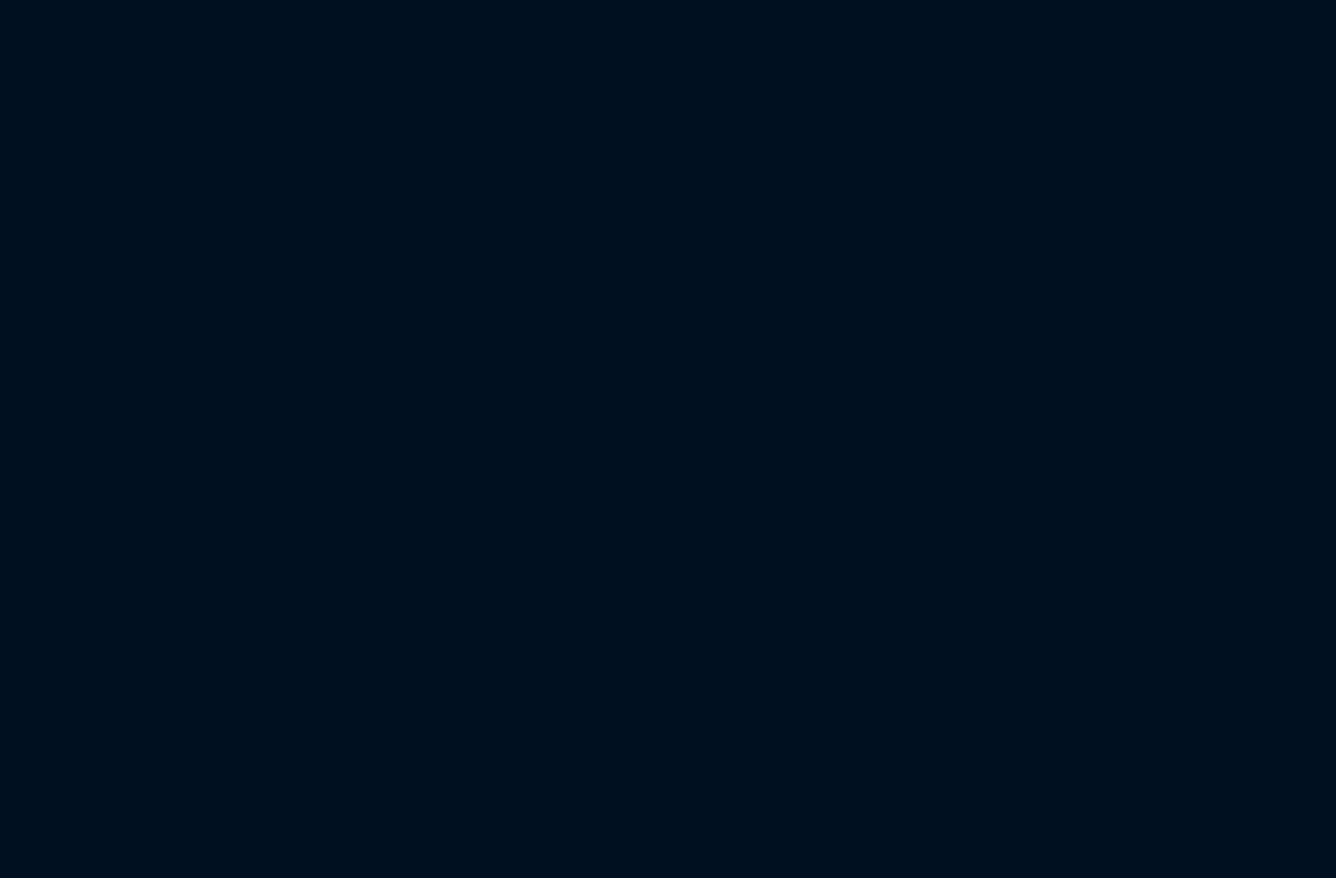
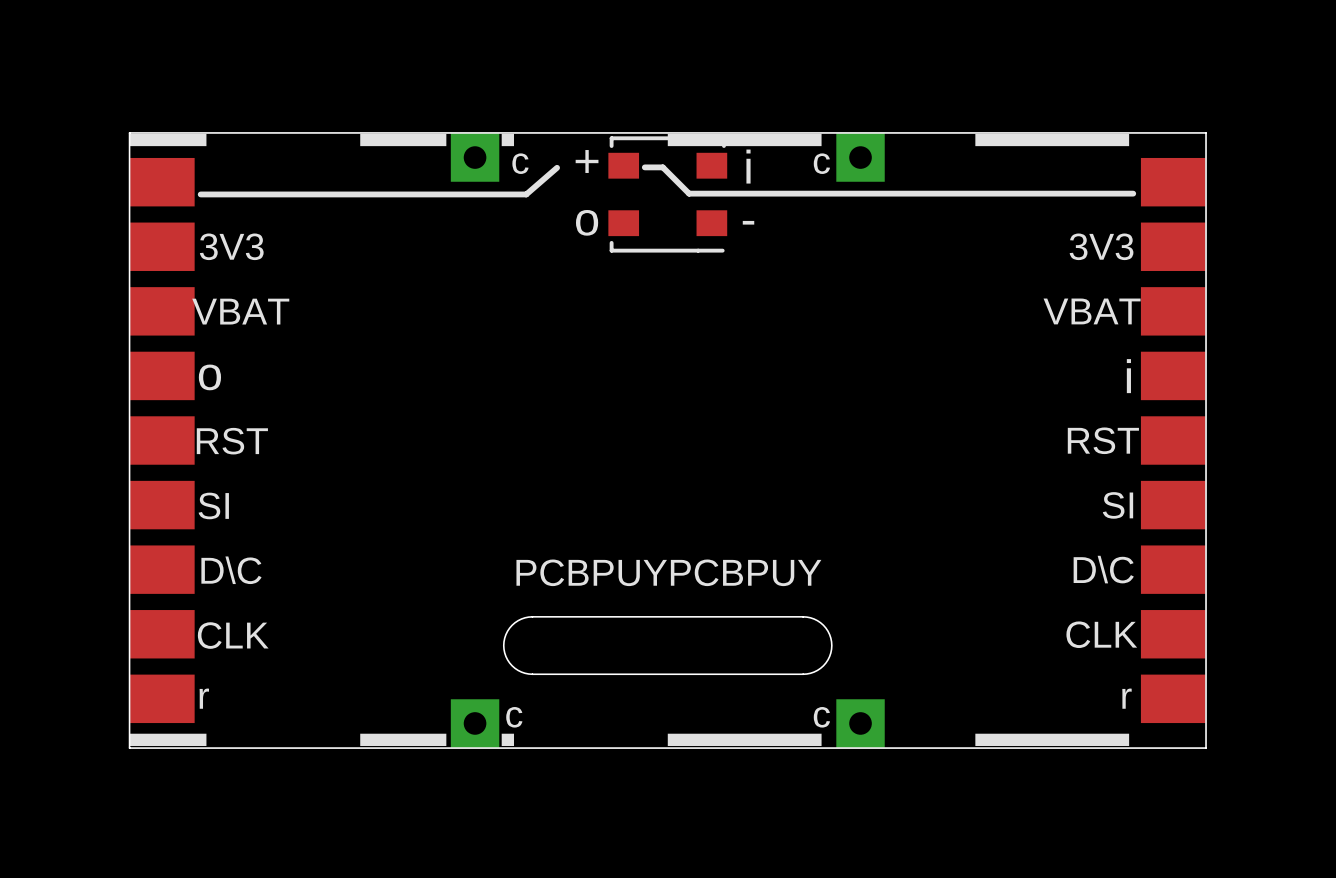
board edge: none -> (129, 132) (1206, 132) (1206, 748) (129, 748) (129, 132)
drawing: none -> [129, 133, 207, 147]
drawing: none -> [360, 133, 447, 147]
drawing: none -> [501, 133, 515, 147]
drawing: none -> [667, 133, 822, 147]
drawing: none -> [975, 133, 1130, 147]
part: none -> (475, 157)
part: none -> (860, 157)
text: none -> c (520, 163)
text: none -> c (821, 163)
line: none -> (557, 167) (526, 194) (200, 194)
line: none -> (644, 167) (662, 167) (689, 193) (1133, 193)
part: none -> (667, 194)
text: none -> 3V3 (231, 246)
text: none -> 3V3 (1101, 246)
text: none -> VBAT (240, 311)
text: none -> VBAT (1092, 311)
text: none -> i (1128, 376)
text: none -> o (209, 377)
part: none -> (162, 440)
text: none -> RST (1103, 440)
part: none -> (1173, 440)
text: none -> RST (232, 441)
text: none -> SI (1117, 505)
text: none -> SI (213, 505)
text: none -> D\C (231, 570)
text: none -> D\C (1103, 569)
text: none -> PCBPUYPCBPUY (668, 572)
board edge: none -> (532, 616) (806, 617) (817, 620) (825, 628) (830, 638) (831, 649) (823, 665) (806, 674) (528, 674) (518, 670) (509, 663) (504, 652) (504, 641) (507, 631) (514, 622) (532, 616)
text: none -> CLK (1101, 634)
text: none -> CLK (233, 635)
text: none -> r (204, 698)
text: none -> r (1126, 698)
text: none -> c (514, 717)
text: none -> c (821, 717)
part: none -> (475, 723)
part: none -> (860, 723)
drawing: none -> [129, 733, 207, 747]
drawing: none -> [360, 733, 447, 747]
drawing: none -> [501, 733, 515, 747]
drawing: none -> [667, 733, 822, 747]
drawing: none -> [975, 733, 1130, 747]

